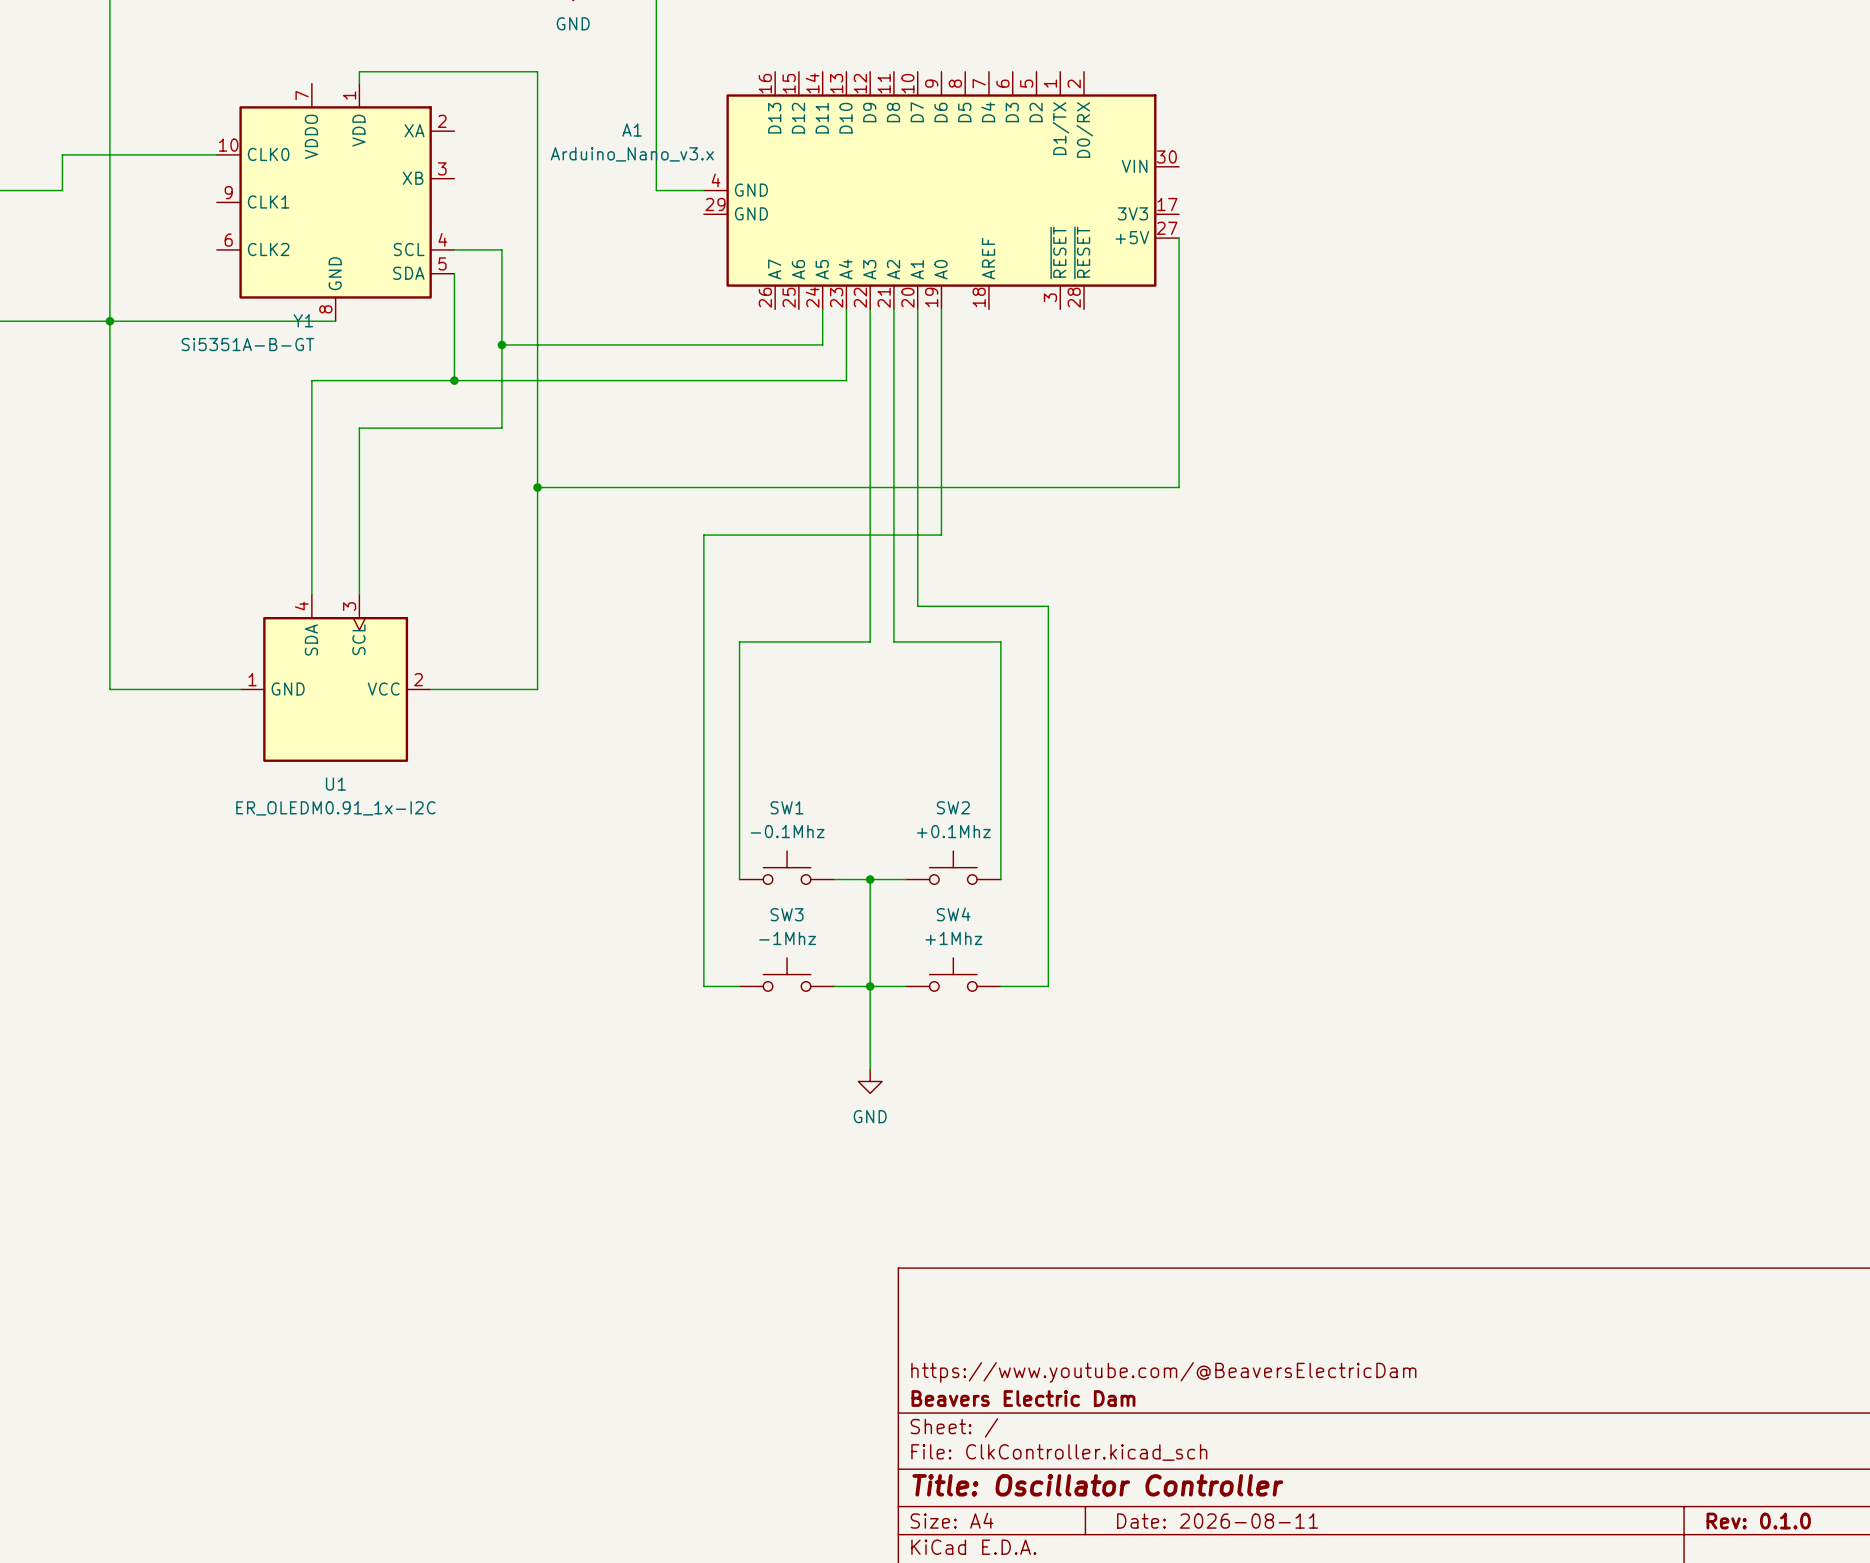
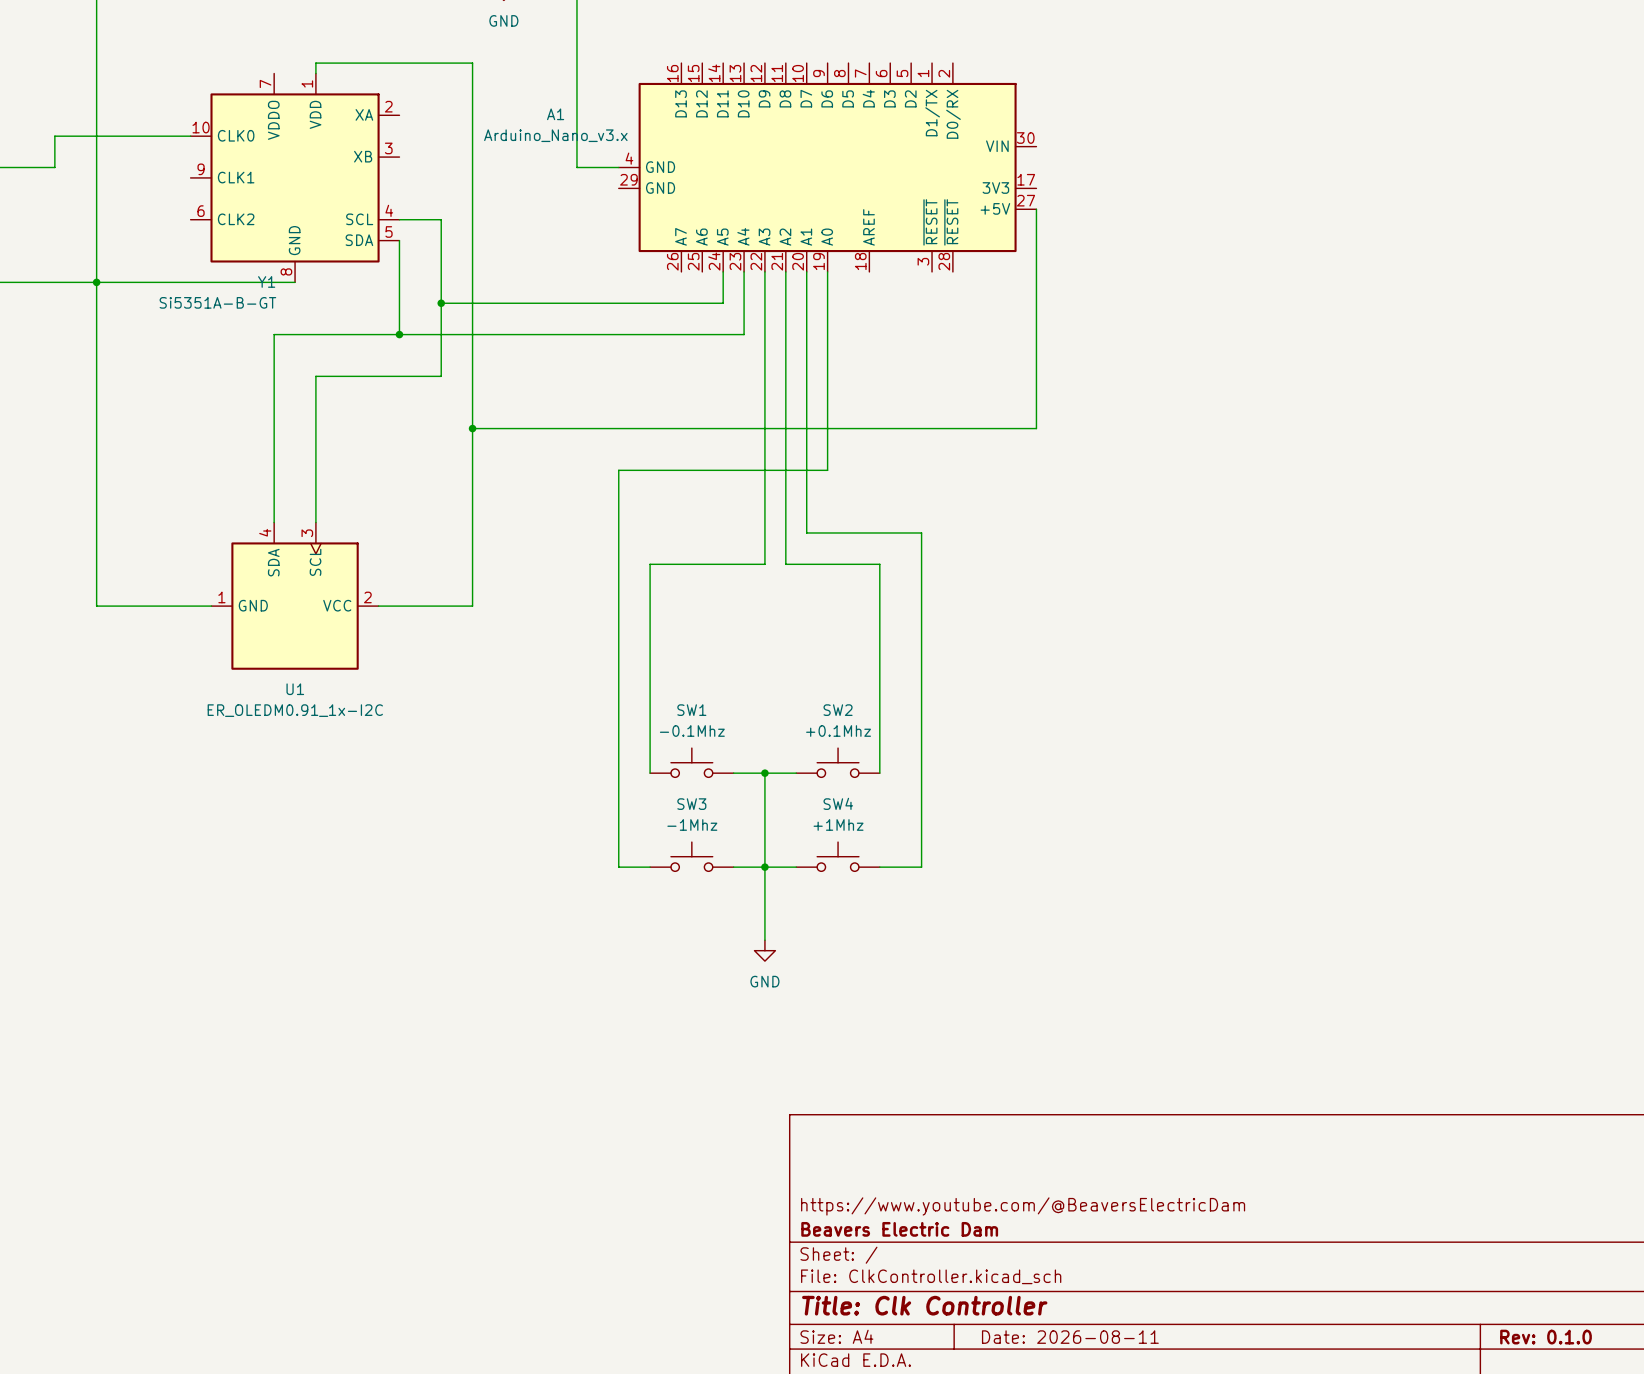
title block: Title: Oscillator Controller (1097, 1485) -> Title: Clk Controller (924, 1305)

